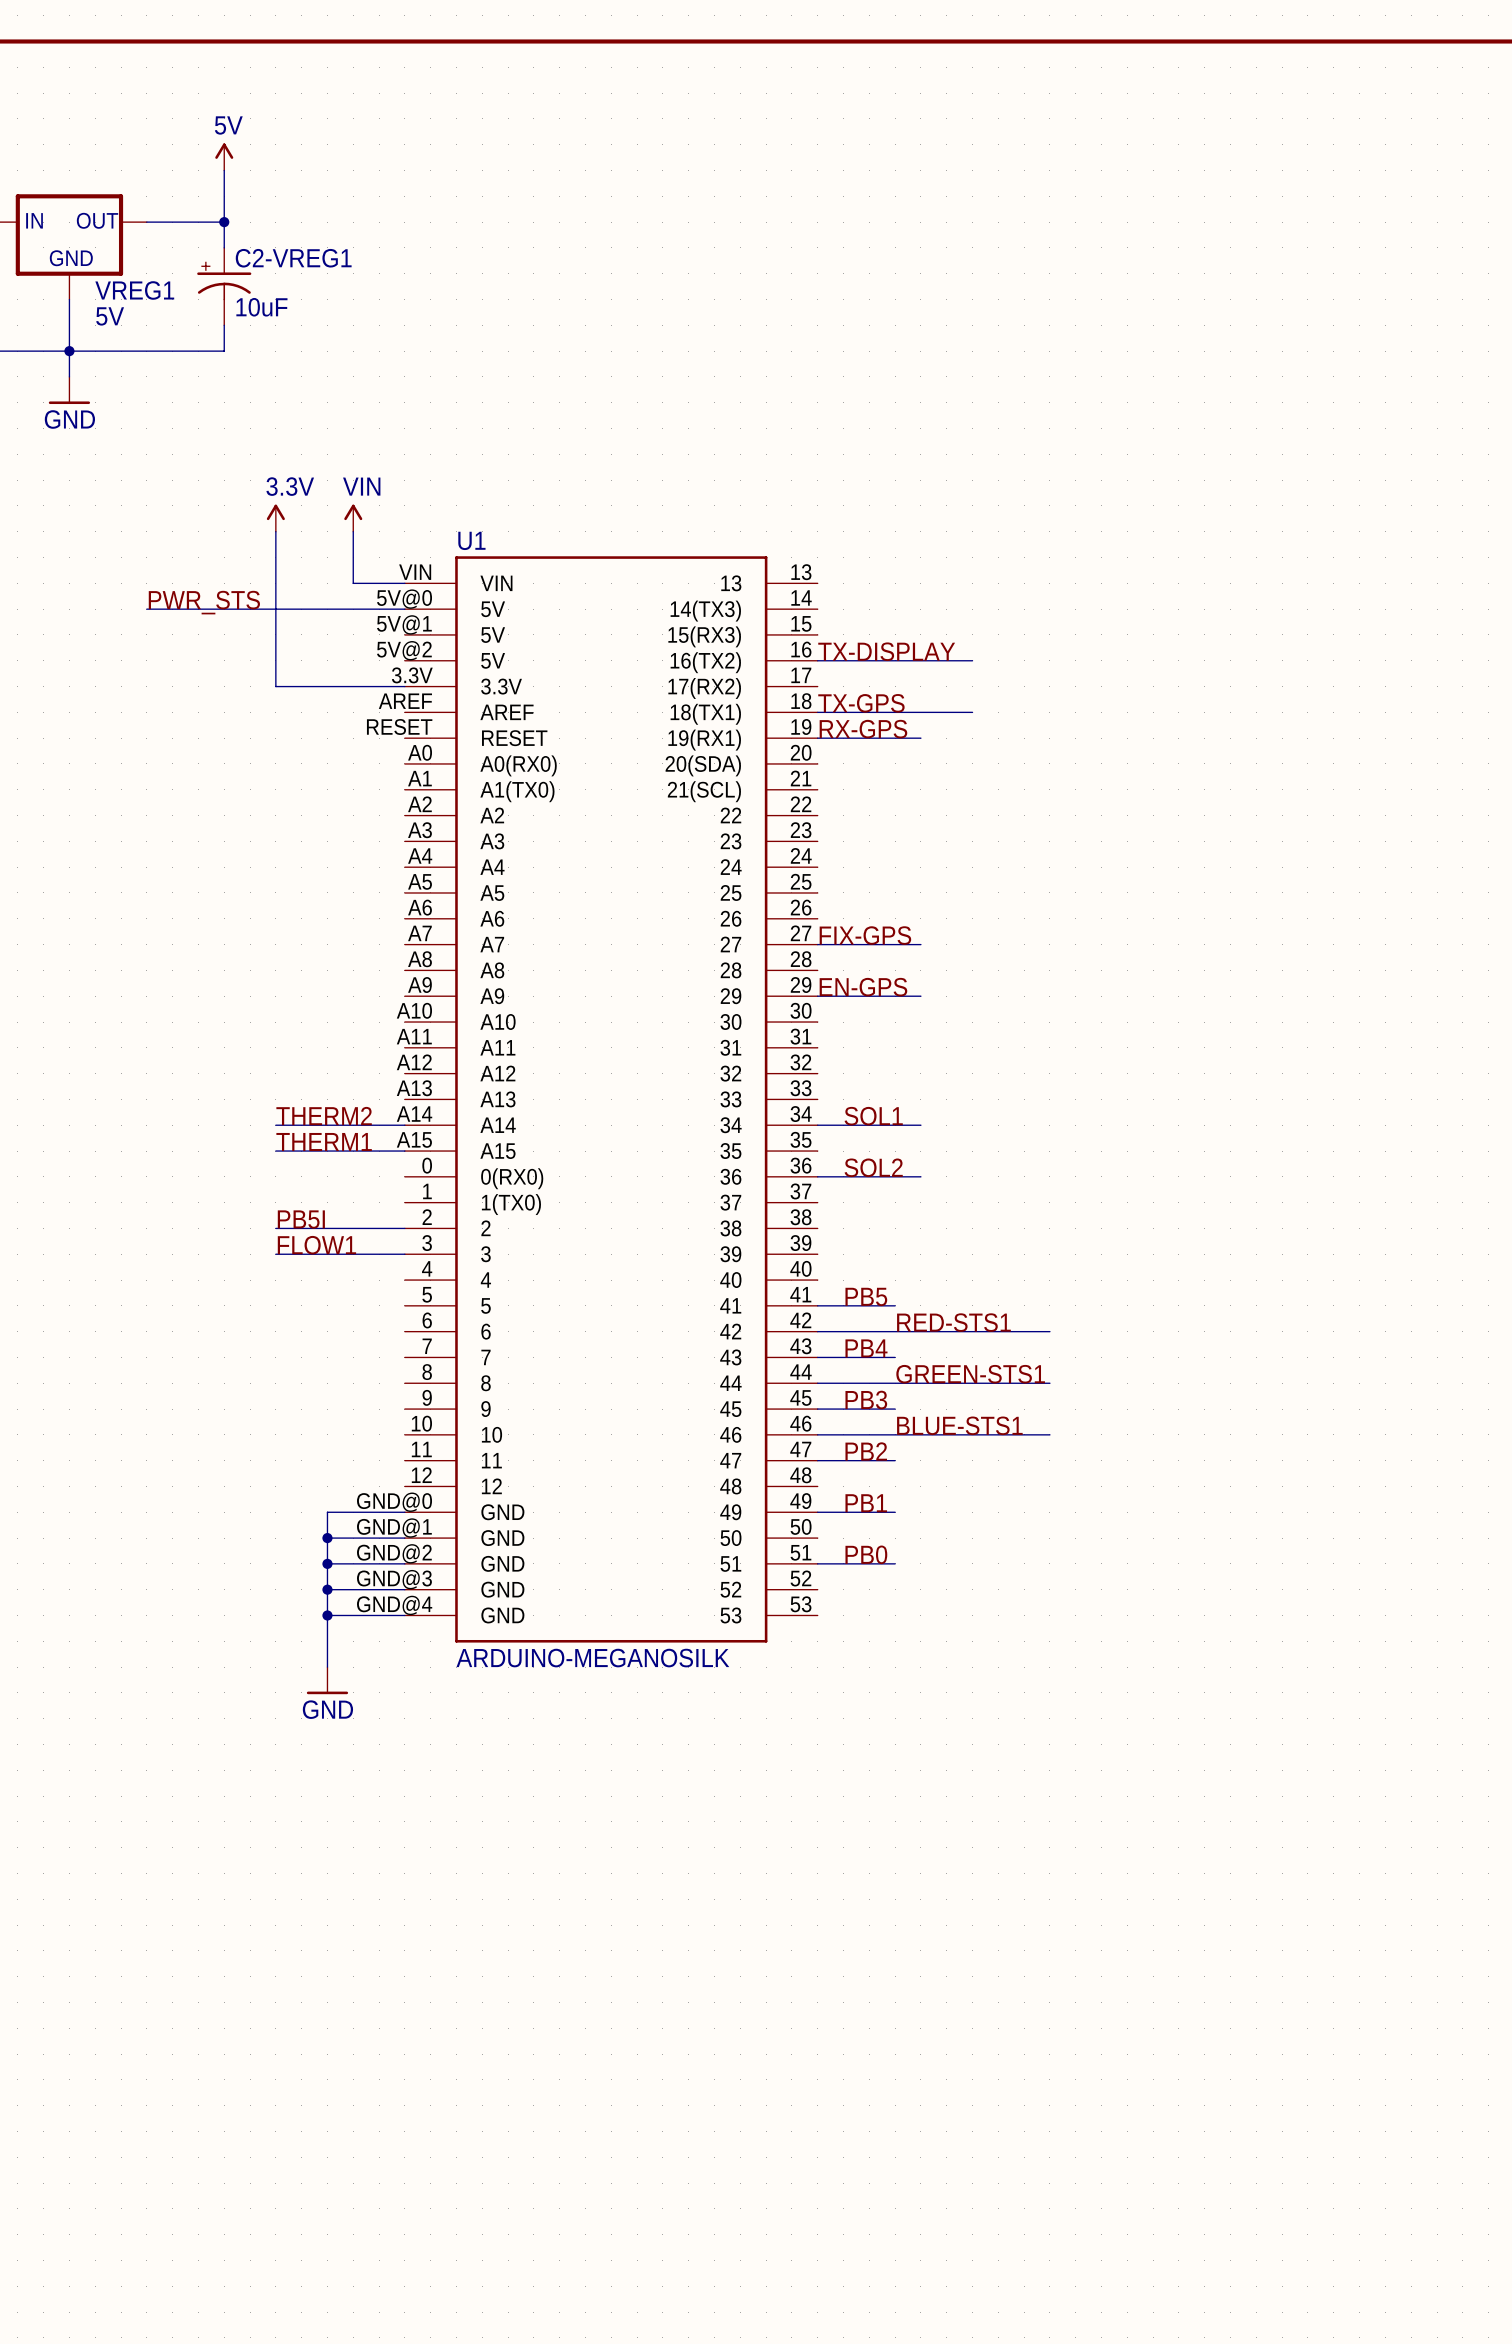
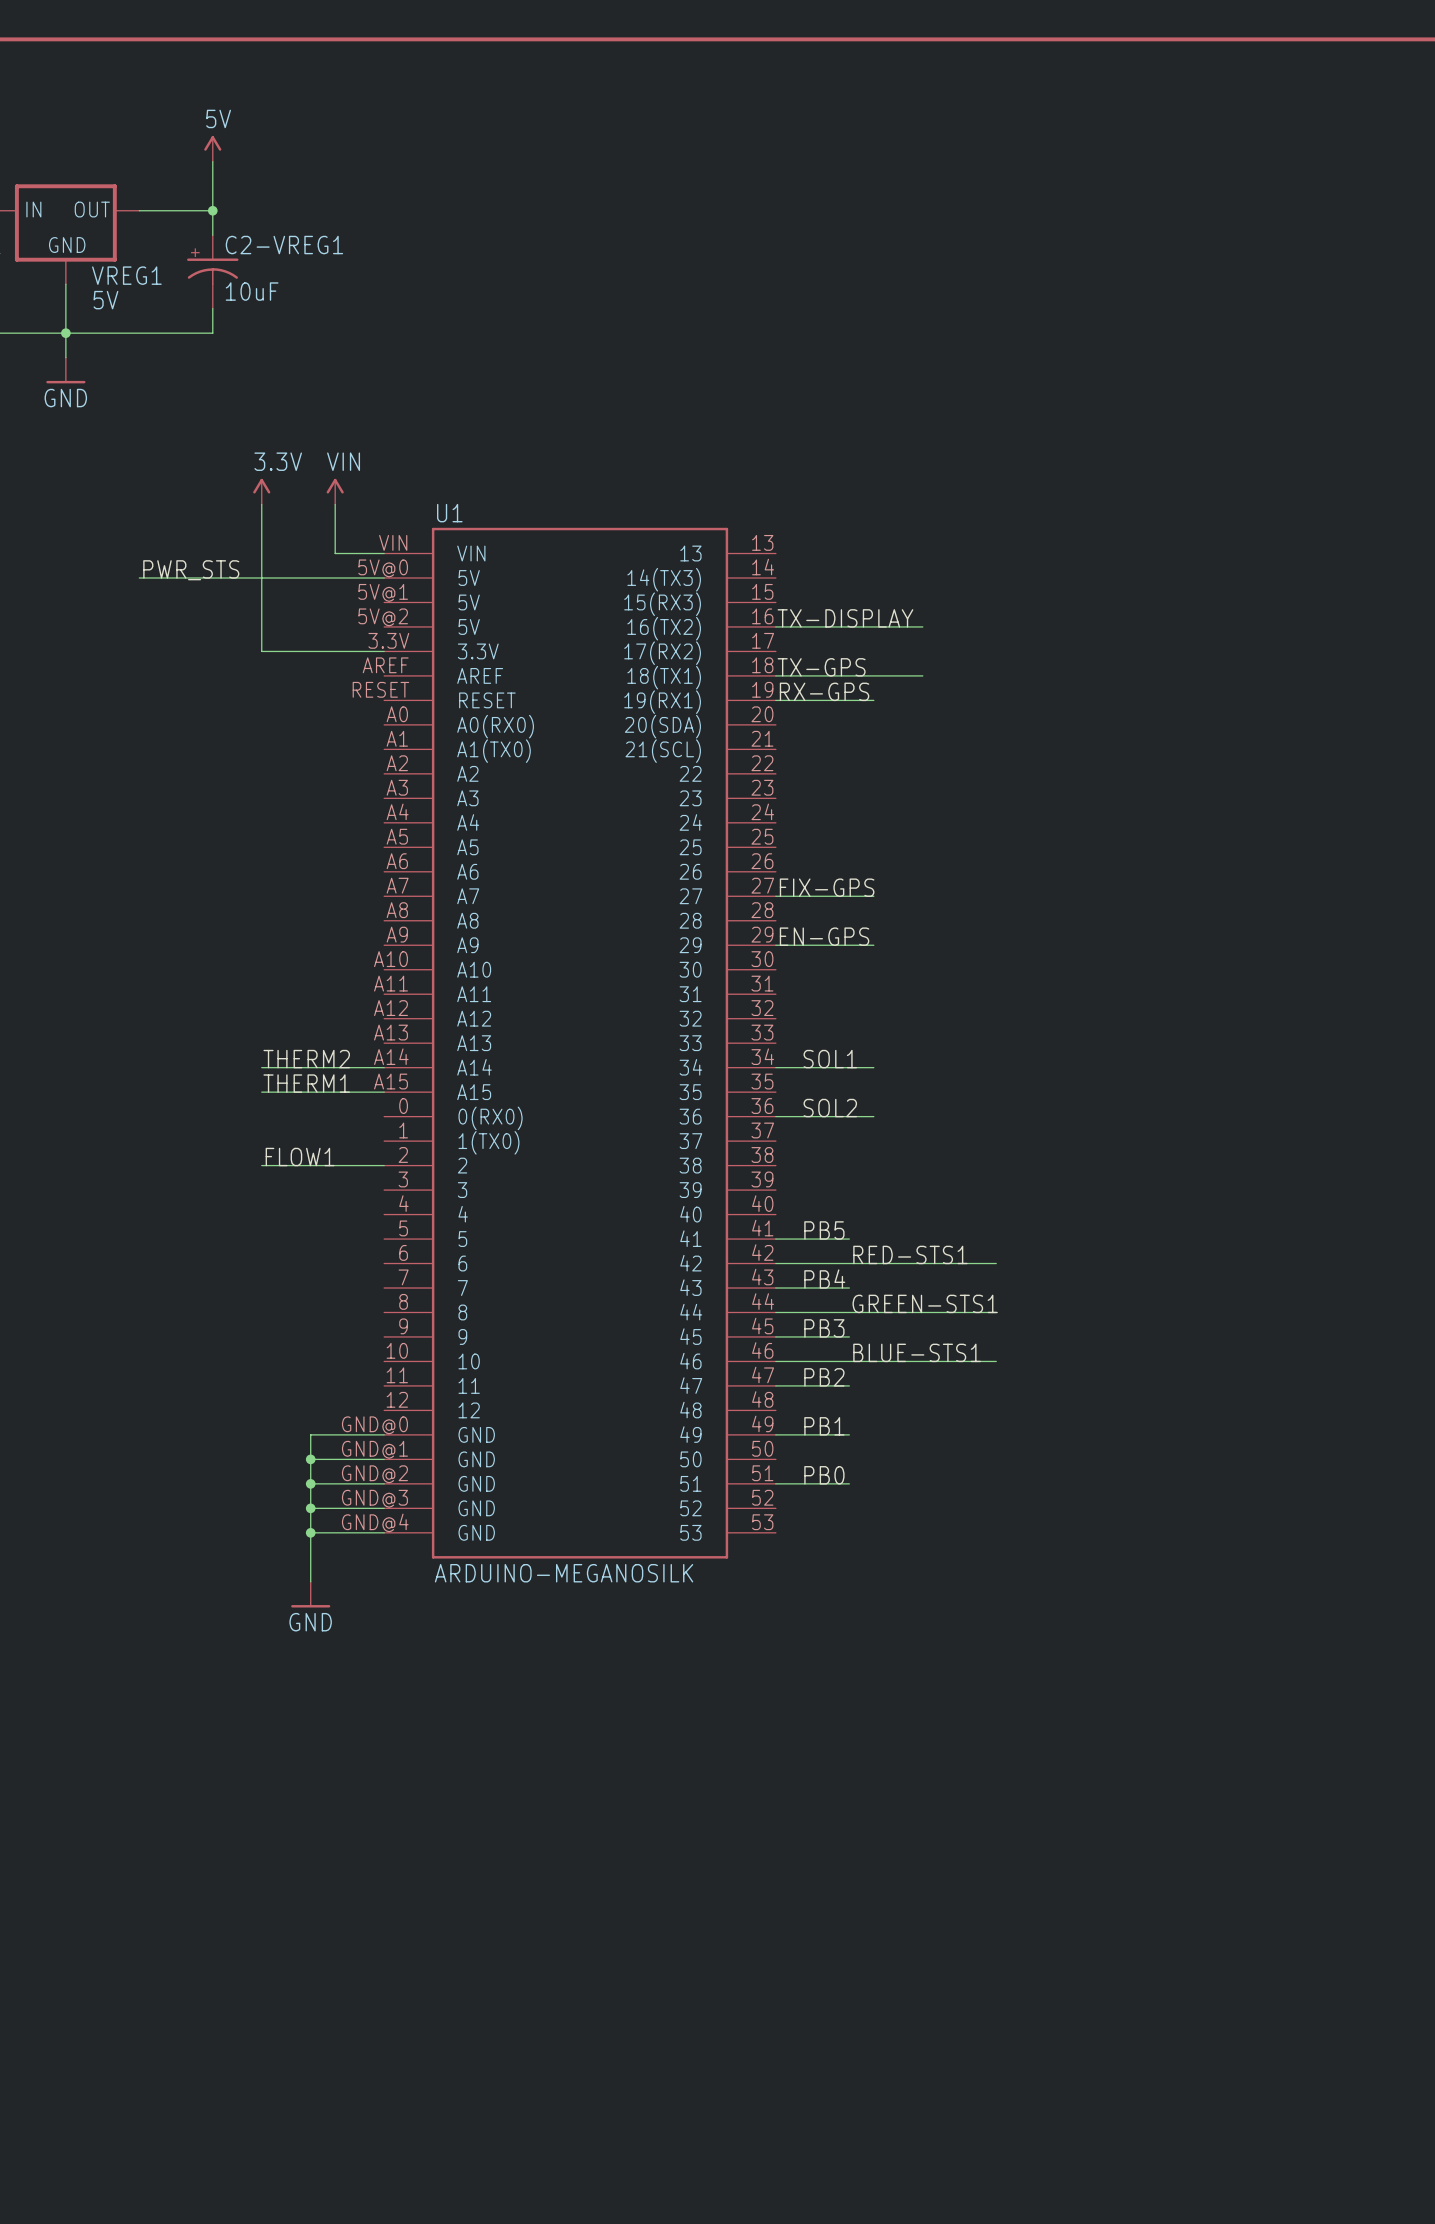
label: PB5I (301, 1219) -> FLOW1 (300, 1157)
label: FLOW1 (316, 1245) -> none
wire: (275, 1254) (404, 1254) -> none

